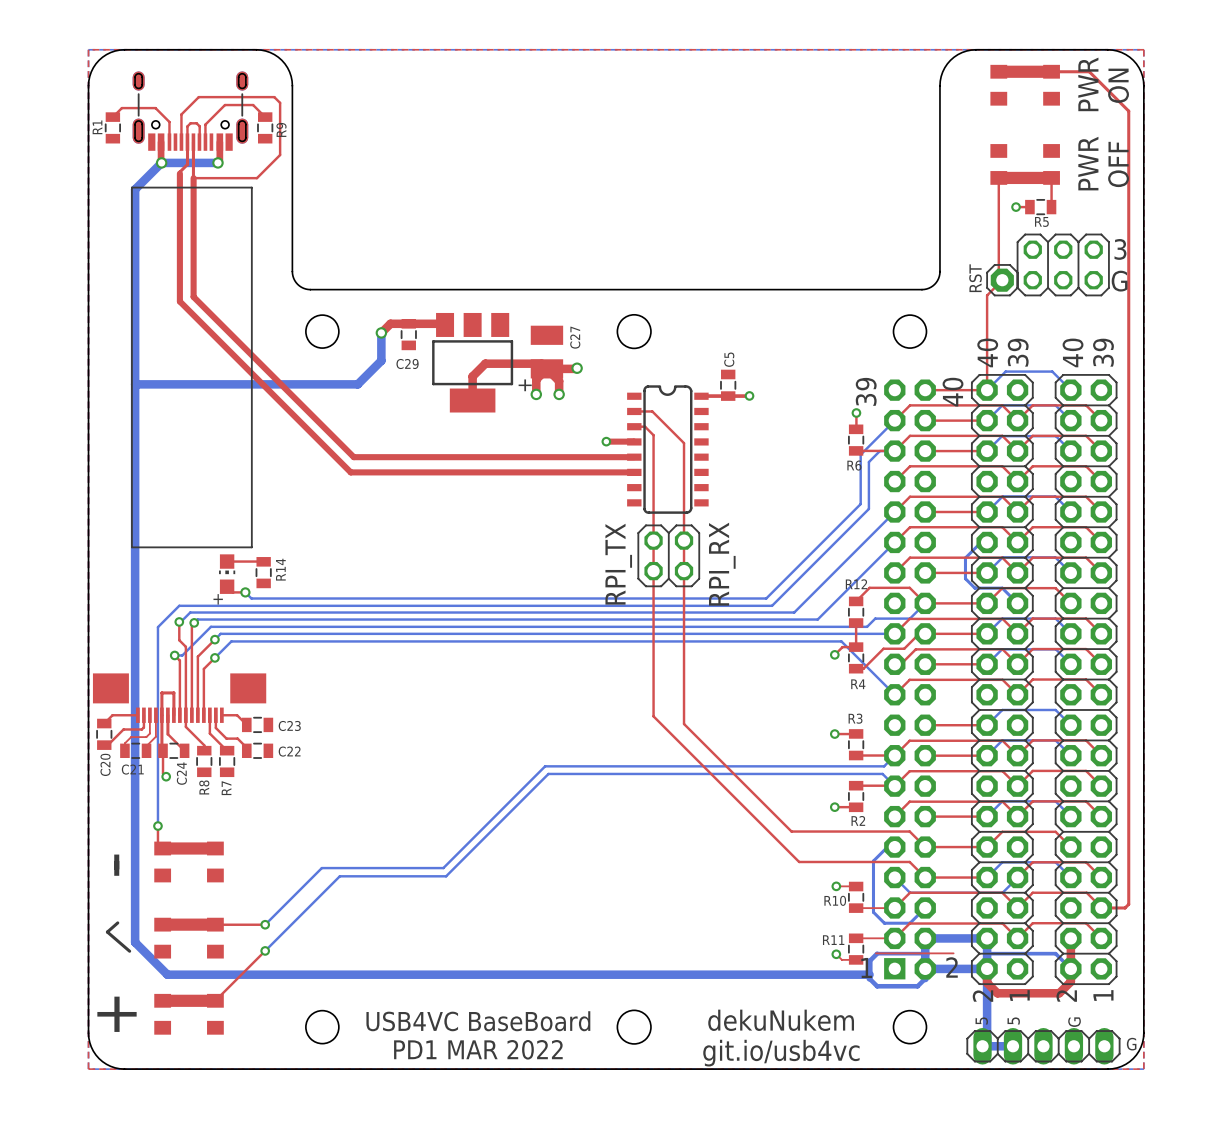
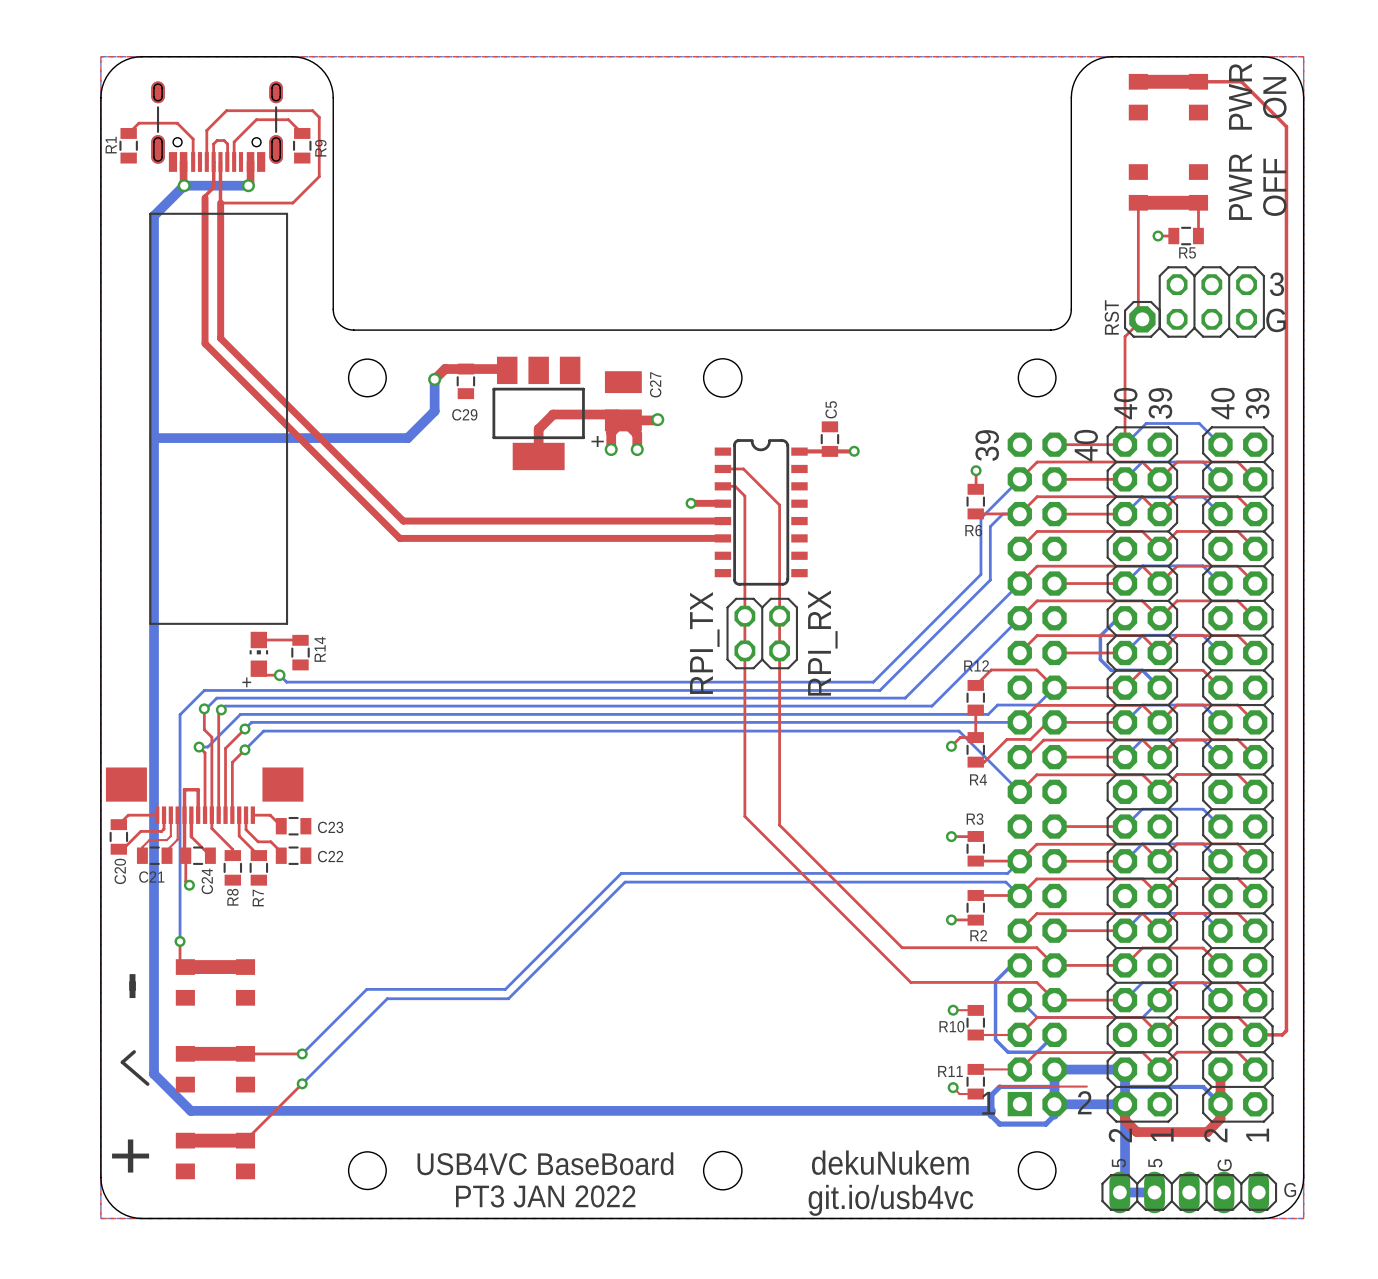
text: PD1 MAR 2022 (478, 1049) -> PT3 JAN 2022 (545, 1196)

